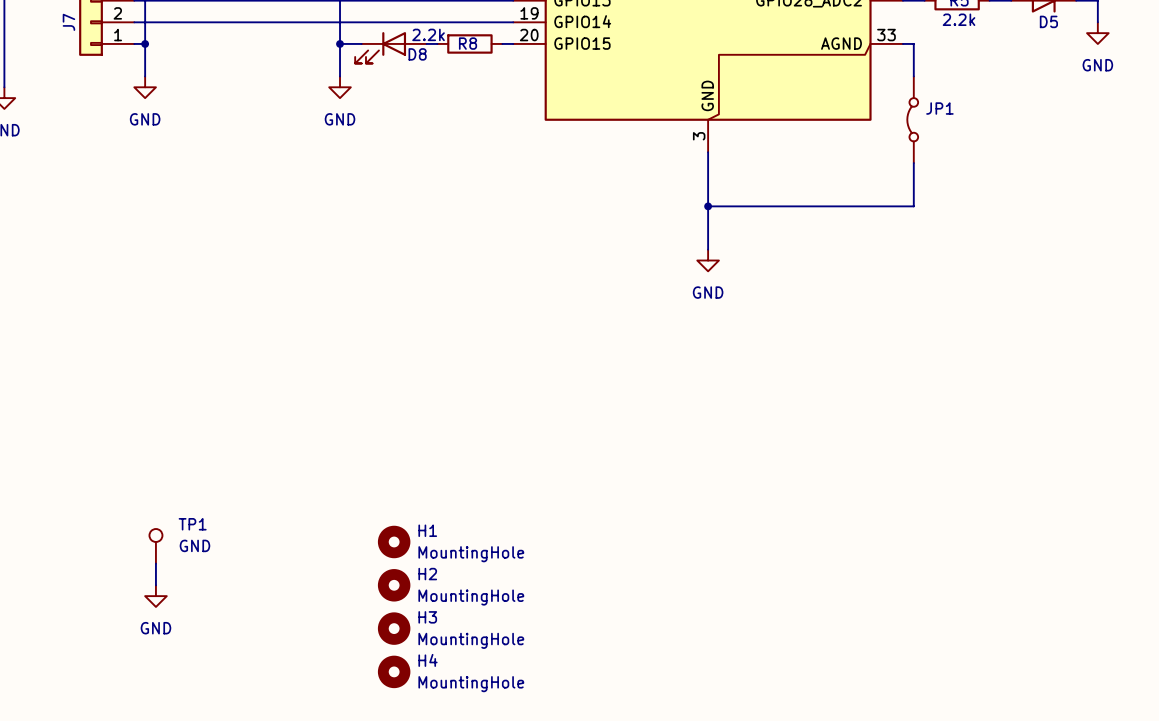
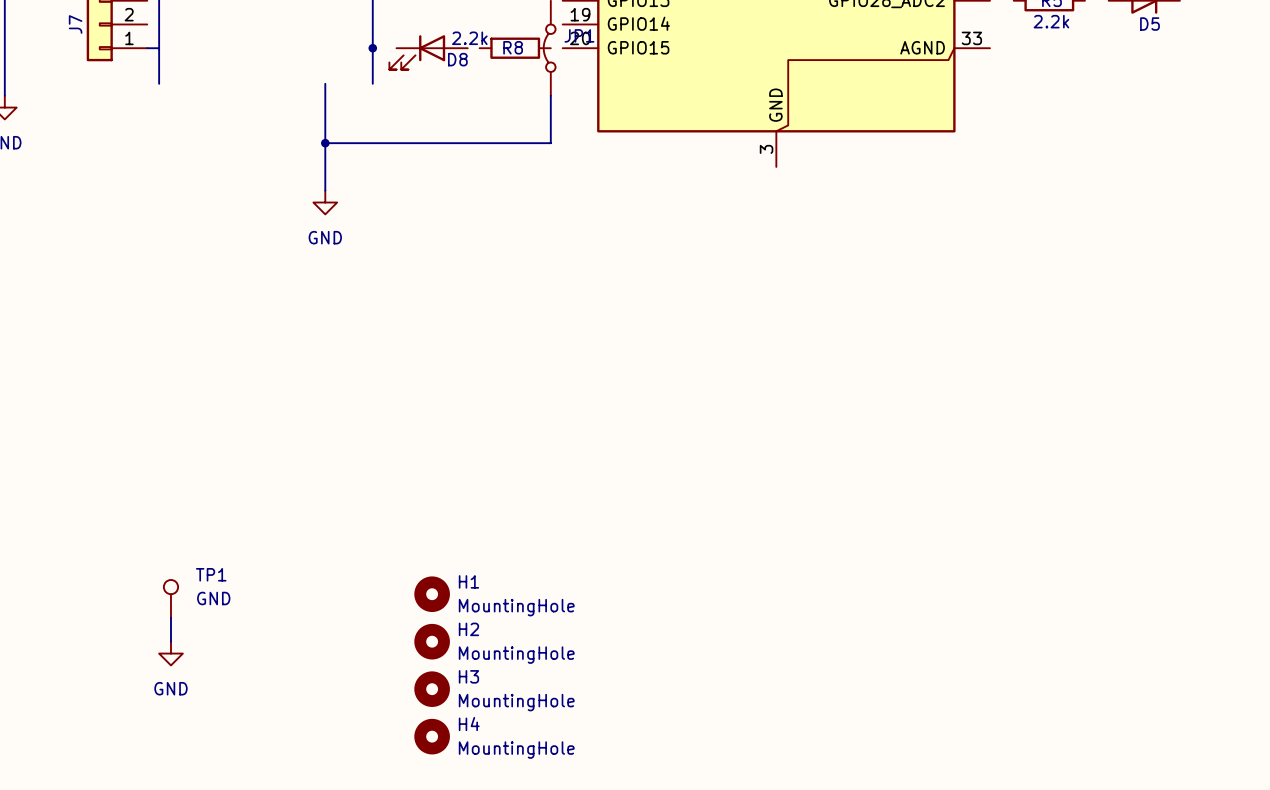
wire: (134, 0) (513, 0) -> none
wire: (902, 0) (924, 0) -> none
wire: (989, 0) (1011, 0) -> none
wire: (1076, 0) (1097, 0) (1097, 22) -> none
wire: (134, 22) (513, 22) -> none
power symbol: GND (1097, 33) -> none
junction: (145, 43) -> none
wire: (340, 43) (361, 43) -> none
wire: (426, 43) (437, 43) -> none
wire: (502, 43) (513, 43) -> none
wire: (902, 43) (913, 43) (913, 76) -> none
wire: none -> (325, 83) (325, 190)
power symbol: GND (145, 87) -> none
power symbol: GND (340, 87) -> none
wire: none -> (550, 95) (550, 143) (325, 143)
JP1 position: (912, 119) -> (549, 48)
junction: none -> (325, 143)
wire: (708, 152) (708, 249) -> none
wire: (913, 163) (913, 206) (708, 206) -> none
power symbol: none -> GND (325, 202)
junction: (708, 206) -> none
power symbol: GND (708, 260) -> none

